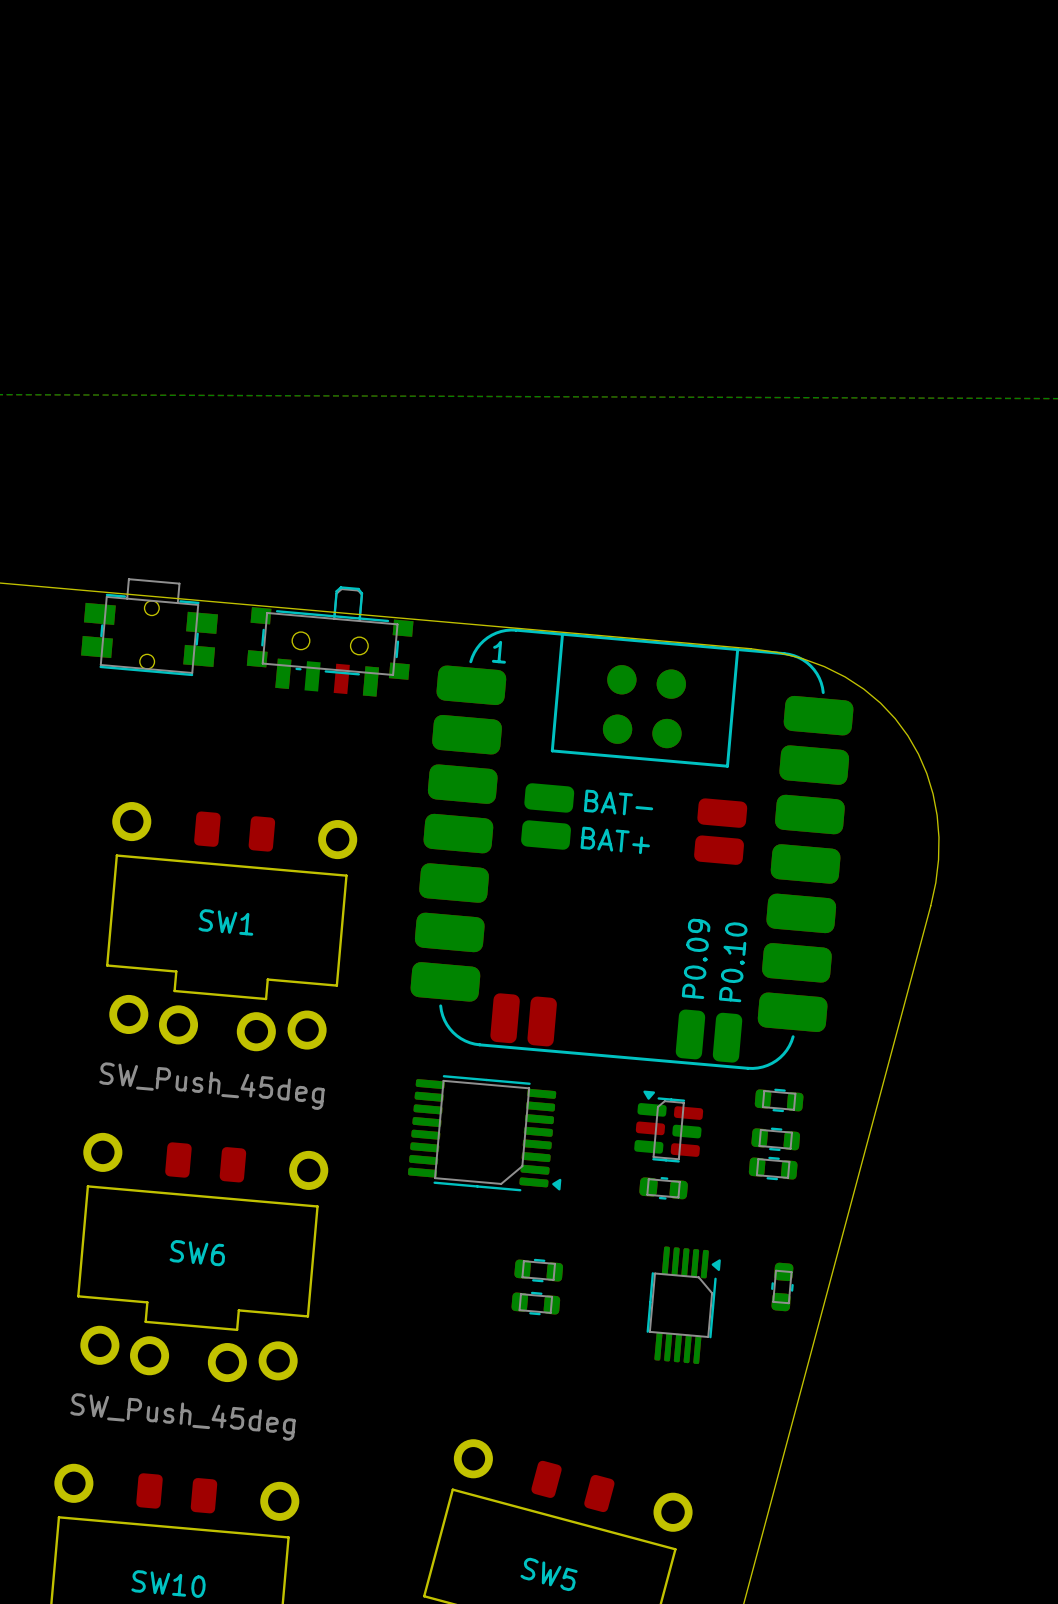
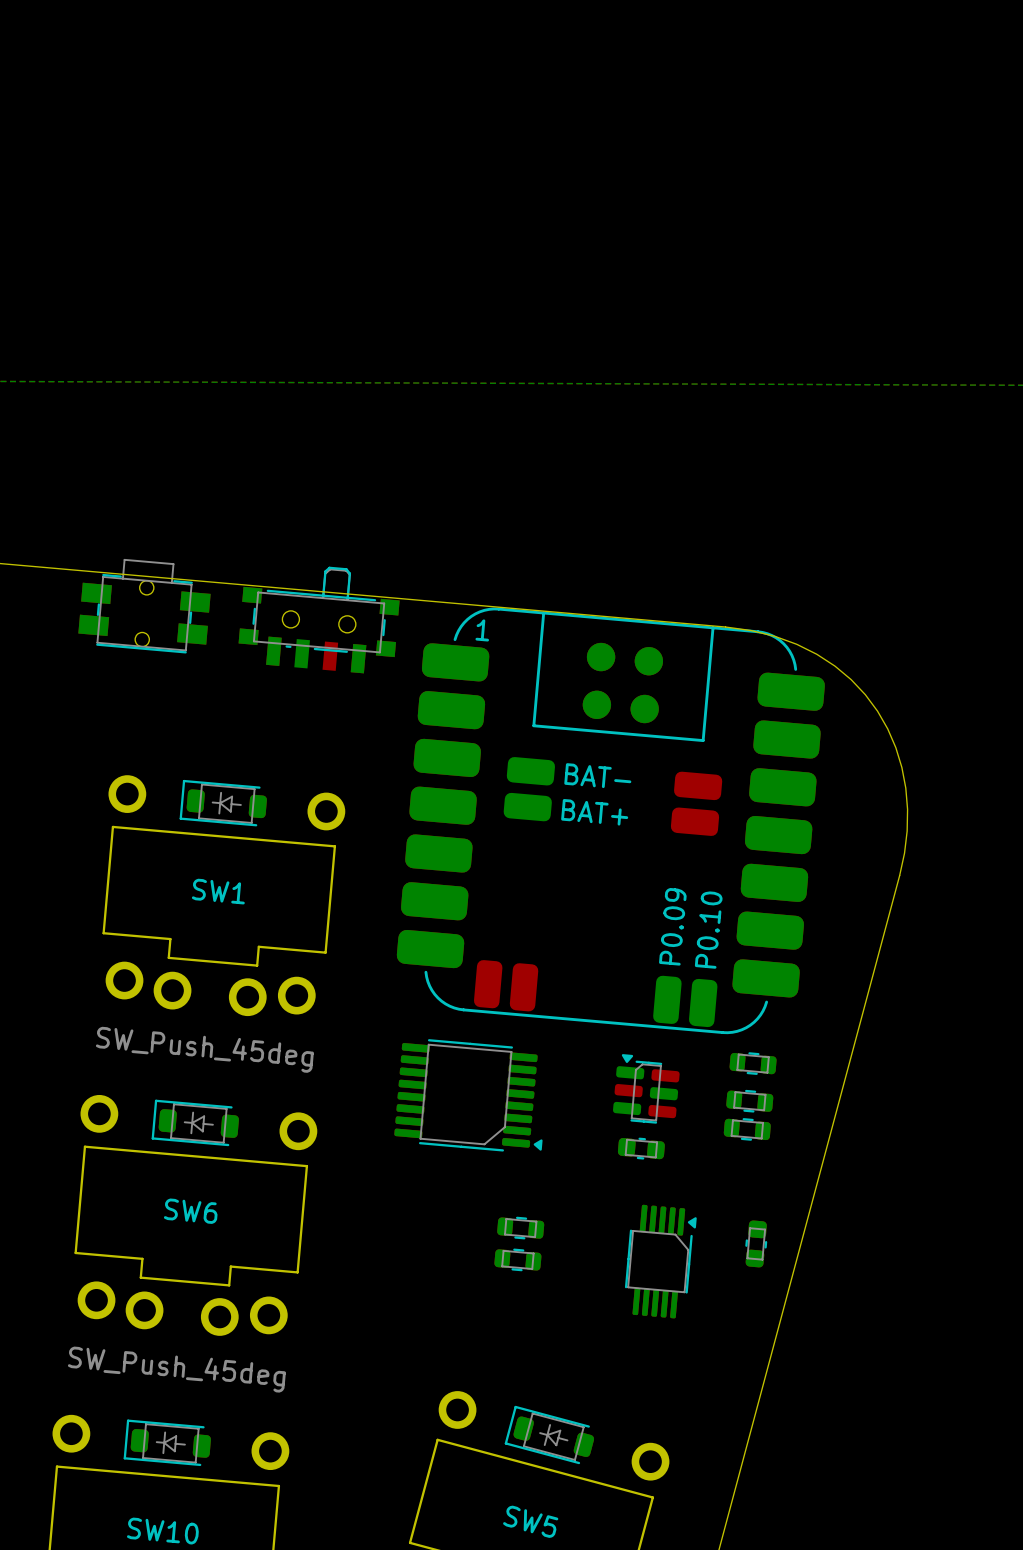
part footprint: [194, 811, 276, 852] -> [179, 779, 267, 827]
part footprint: [165, 1142, 247, 1183] -> [151, 1099, 239, 1147]
part footprint: [531, 1460, 615, 1513] -> [504, 1405, 595, 1465]
part footprint: [136, 1473, 218, 1514] -> [123, 1419, 211, 1467]

